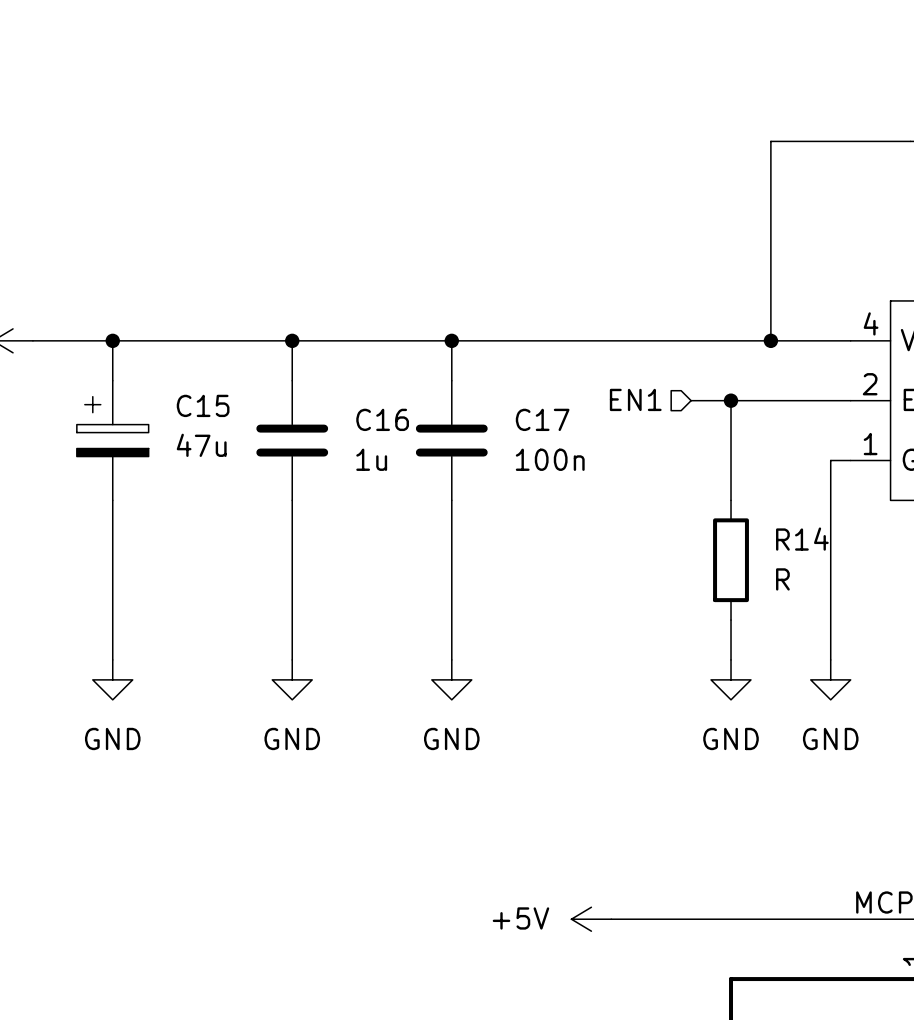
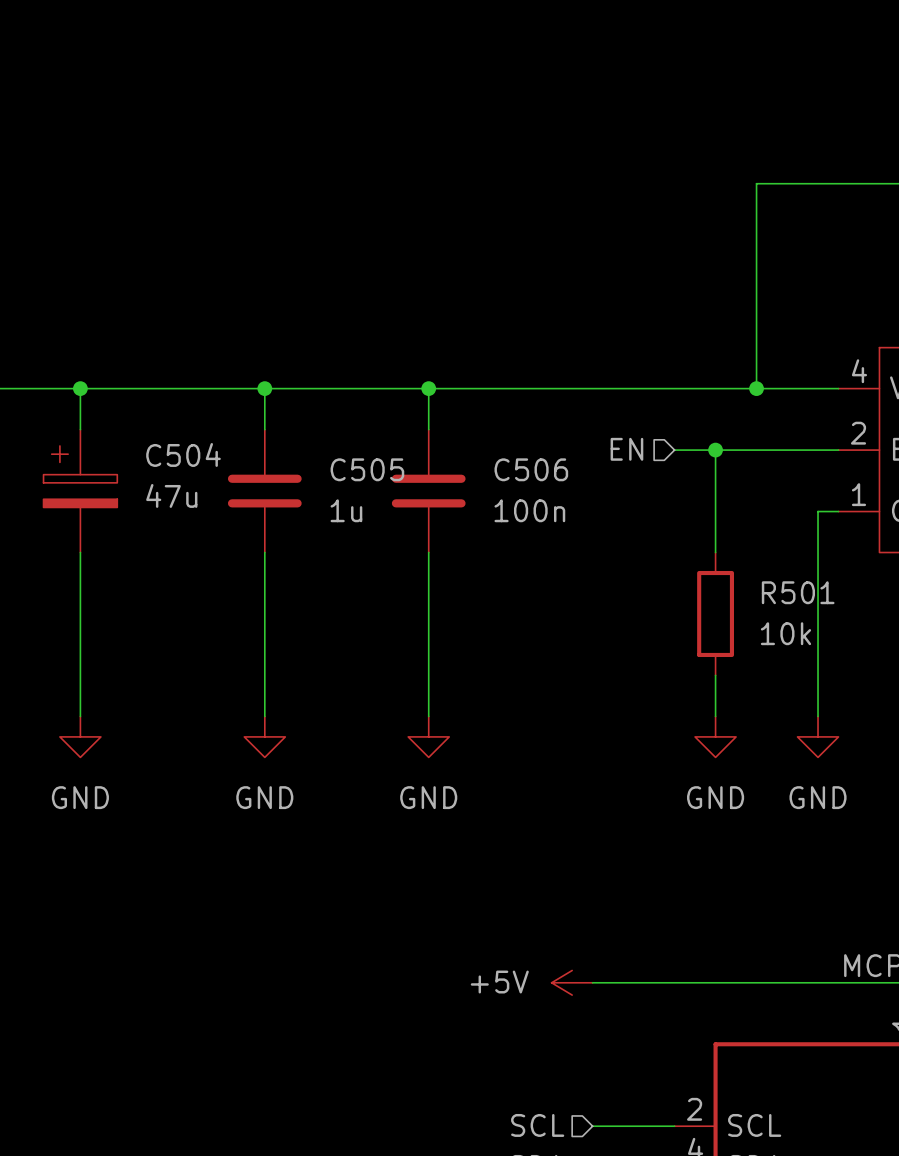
hierarchical label: EN1 (635, 399) -> EN (626, 449)
C15 name: C15 (203, 405) -> C504 (183, 454)
C16 name: C16 (382, 419) -> C505 (367, 469)
C17 name: C17 (542, 419) -> C506 (531, 469)
R14 name: R14 (802, 539) -> R501 (798, 592)
R14 value: R (782, 579) -> 10k (785, 633)

